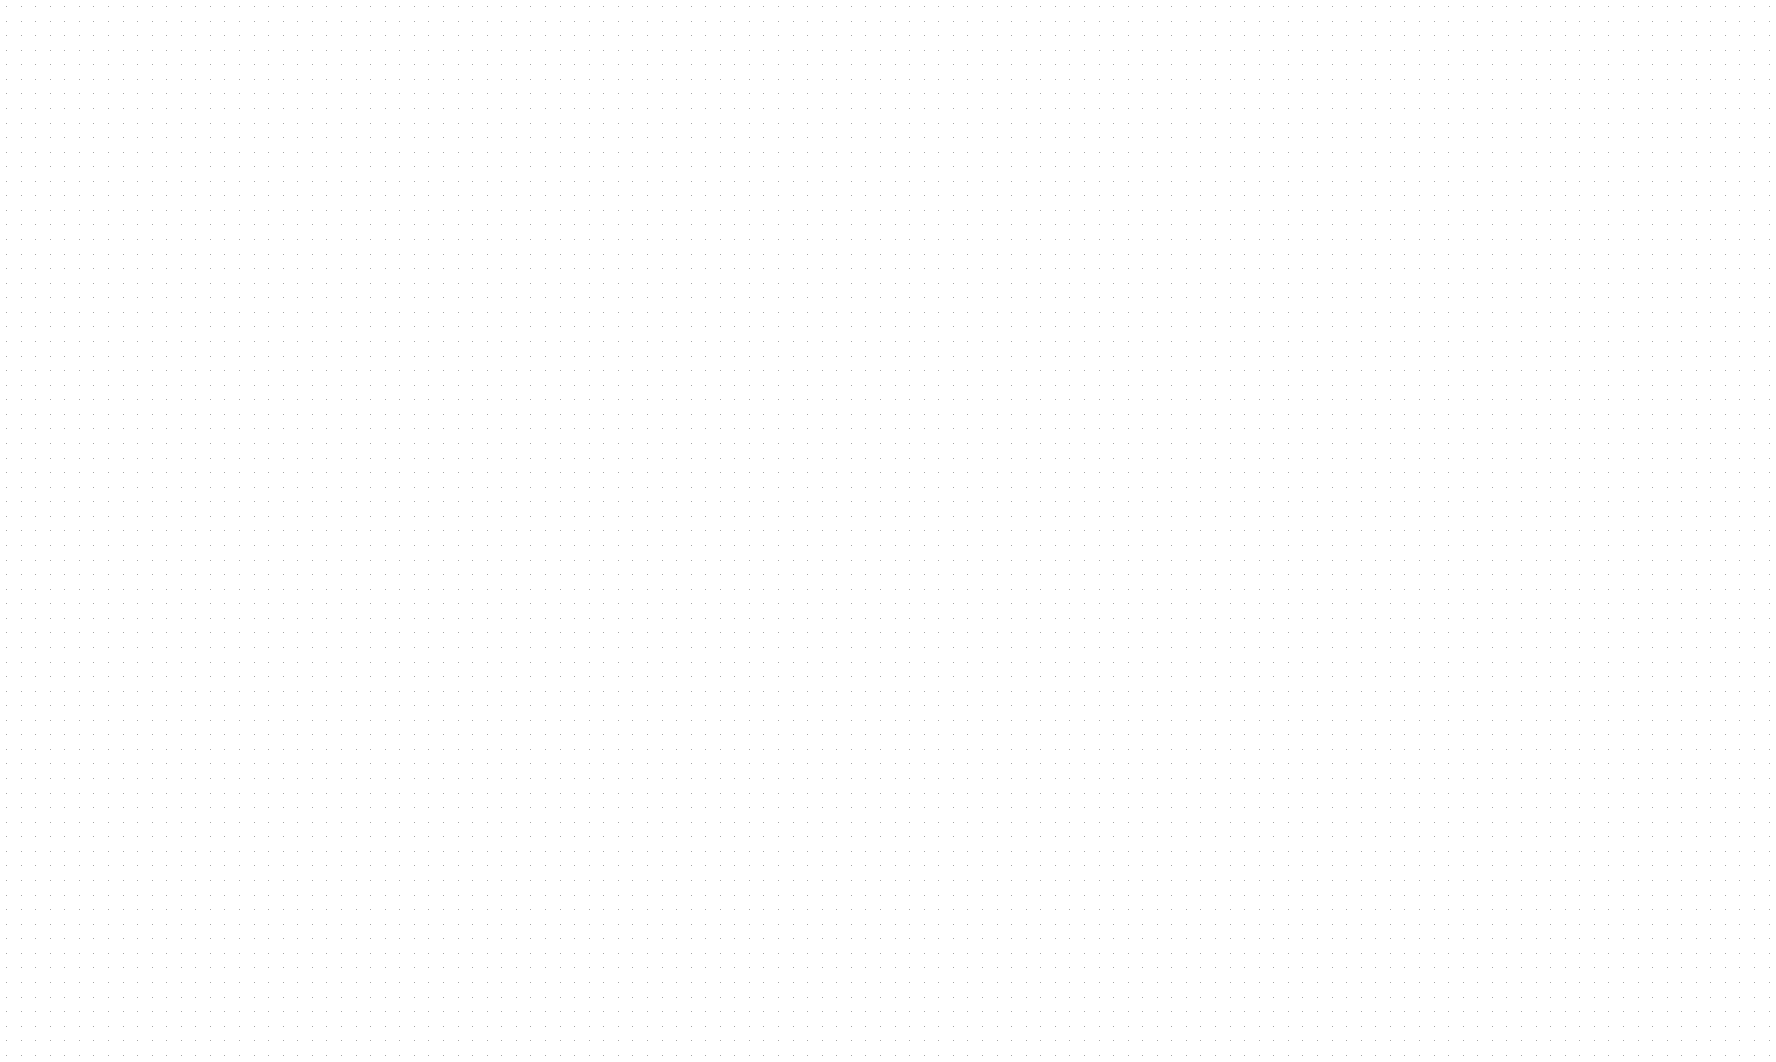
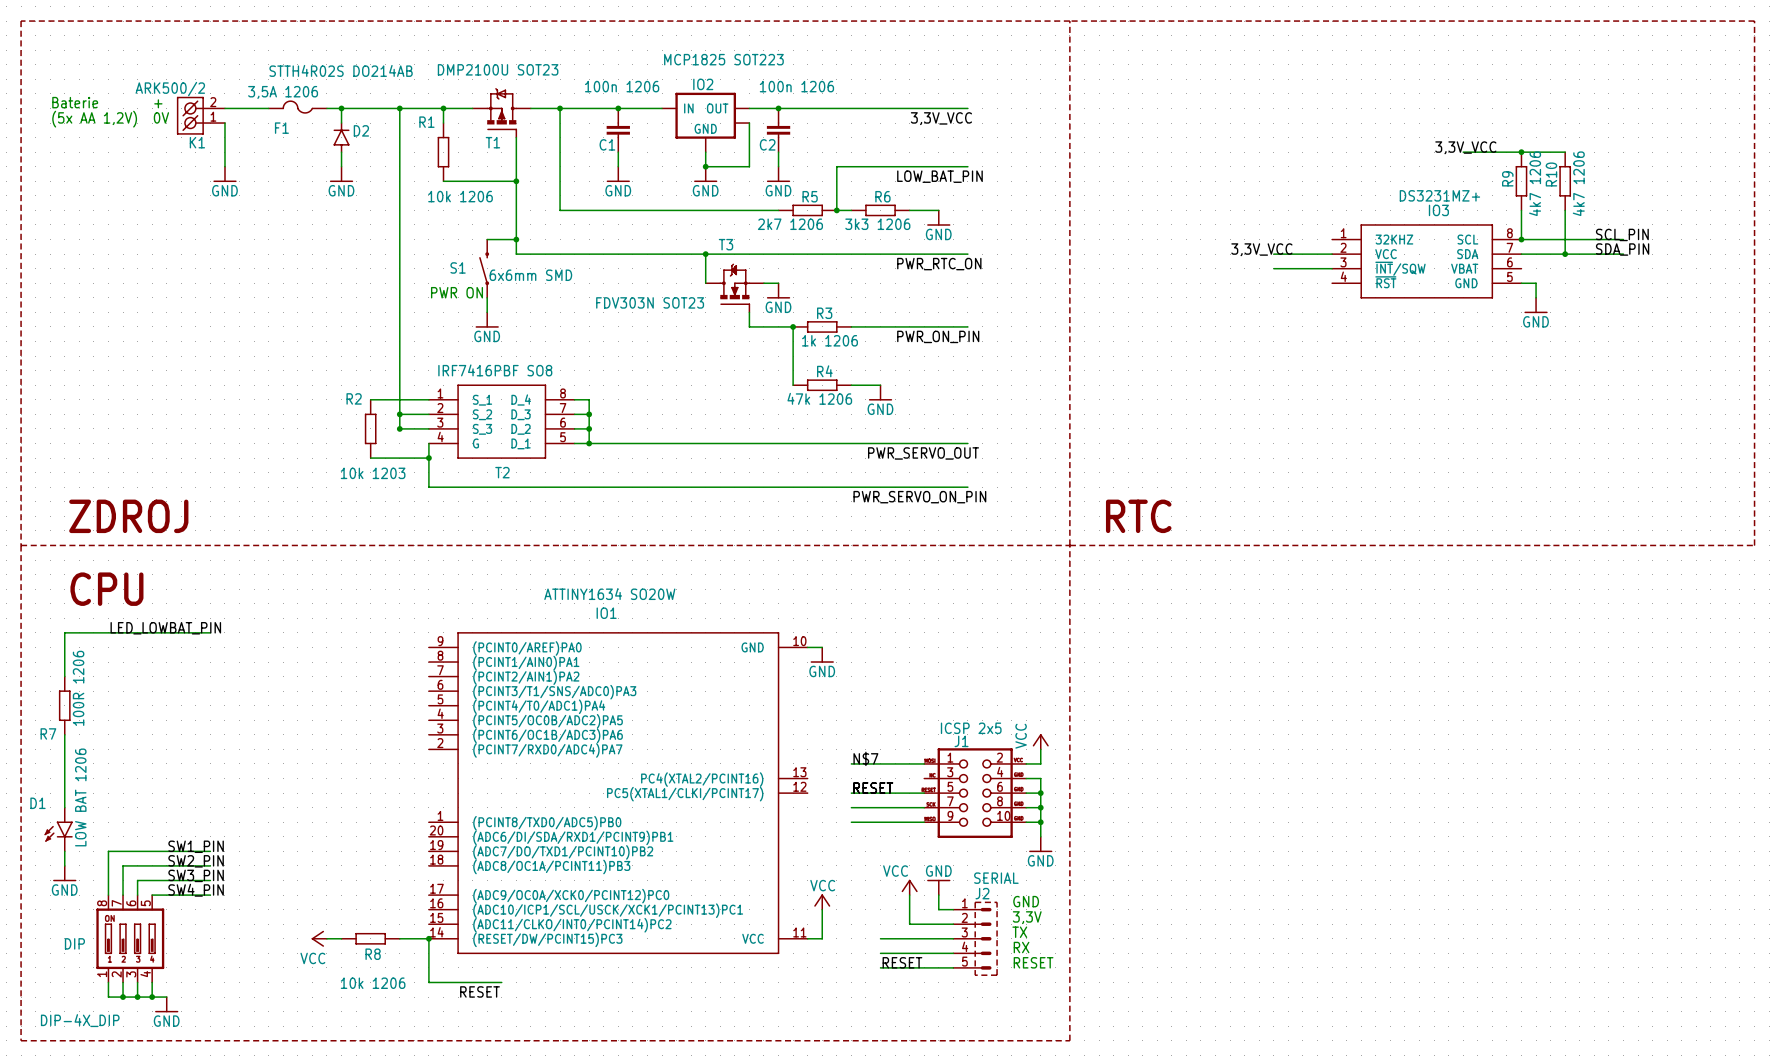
line: none -> (1069, 21) (1069, 1040) (21, 1040) (21, 21) (1754, 21) (1754, 545) (21, 545)
text: none -> Baterie (75, 102)
text: none -> + (158, 103)
F1: none -> 3,5A 1206 (297, 107)
wire: none -> (224, 108) (268, 108)
wire: none -> (326, 108) (472, 108)
wire: none -> (341, 108) (341, 123)
junction: none -> (341, 108)
wire: none -> (399, 108) (399, 428) (428, 428)
junction: none -> (399, 108)
wire: none -> (443, 108) (443, 123)
junction: none -> (443, 108)
wire: none -> (530, 108) (662, 108)
wire: none -> (560, 108) (560, 210) (778, 210)
junction: none -> (560, 108)
junction: none -> (618, 108)
wire: none -> (749, 108) (967, 108)
junction: none -> (778, 108)
T1: none -> DMP2100U SOT23 (501, 113)
K1: none -> ARK500/2 (200, 115)
text: none -> 0V (161, 117)
label: none -> 3,3V_VCC (941, 118)
text: none -> (5x AA 1,2V) (94, 119)
IO2: none -> MCP1825 SOT223 (705, 122)
wire: none -> (224, 123) (224, 166)
wire: none -> (749, 123) (749, 166) (705, 166) (705, 152)
C1: none -> 100n 1206 (618, 130)
C2: none -> 100n 1206 (778, 130)
D2: none -> STTH4R02S DO214AB (341, 137)
wire: none -> (516, 137) (516, 254) (967, 254)
label: none -> 3,3V_VCC (1465, 147)
wire: none -> (341, 152) (341, 166)
R1: none -> 10k 1206 (443, 152)
wire: none -> (618, 152) (618, 166)
wire: none -> (778, 152) (778, 166)
wire: none -> (1463, 152) (1565, 152)
junction: none -> (1521, 152)
junction: none -> (705, 166)
wire: none -> (967, 166) (836, 166) (836, 210) (851, 210)
power symbol: none -> GND (224, 174)
power symbol: none -> GND (341, 174)
power symbol: none -> GND (618, 174)
power symbol: none -> GND (705, 174)
power symbol: none -> GND (778, 174)
label: none -> LOW_BAT_PIN (939, 176)
wire: none -> (443, 181) (516, 181)
junction: none -> (516, 181)
R9: none -> 4k7 1206 (1521, 181)
R10: none -> 4k7 1206 (1565, 181)
R5: none -> 2k7 1206 (807, 210)
junction: none -> (836, 210)
R6: none -> 3k3 1206 (880, 210)
wire: none -> (909, 210) (938, 210)
wire: none -> (1521, 210) (1521, 239) (1623, 239)
wire: none -> (1565, 210) (1565, 254)
power symbol: none -> GND (938, 218)
label: none -> SCL_PIN (1622, 234)
wire: none -> (487, 239) (516, 239)
junction: none -> (516, 239)
junction: none -> (1521, 239)
label: none -> 3,3V_VCC (1261, 249)
label: none -> SDA_PIN (1622, 249)
wire: none -> (705, 254) (705, 283)
junction: none -> (705, 254)
wire: none -> (1273, 254) (1332, 254)
wire: none -> (1521, 254) (1623, 254)
junction: none -> (1565, 254)
IO3: none -> DS3231MZ+ (1426, 261)
label: none -> PWR_RTC_ON (939, 264)
S1: none -> 6x6mm SMD (484, 268)
wire: none -> (1273, 268) (1332, 268)
wire: none -> (763, 283) (778, 283)
wire: none -> (1521, 283) (1536, 283) (1536, 297)
T3: none -> FDV303N SOT23 (734, 288)
power symbol: none -> GND (778, 290)
text: none -> PWR ON (457, 292)
wire: none -> (487, 297) (487, 312)
power symbol: none -> GND (1536, 305)
wire: none -> (749, 312) (749, 326) (793, 326) (793, 385)
power symbol: none -> GND (487, 320)
junction: none -> (793, 326)
R3: none -> 1k 1206 (822, 326)
wire: none -> (851, 326) (967, 326)
label: none -> PWR_ON_PIN (938, 336)
R4: none -> 47k 1206 (822, 385)
wire: none -> (851, 385) (880, 385)
power symbol: none -> GND (880, 392)
wire: none -> (370, 399) (428, 399)
wire: none -> (574, 399) (589, 399) (589, 443)
wire: none -> (399, 414) (428, 414)
junction: none -> (399, 414)
wire: none -> (574, 414) (589, 414)
junction: none -> (589, 414)
T2: none -> IRF7416PBF SO8 (501, 421)
R2: none -> 10k 1203 (370, 428)
junction: none -> (399, 428)
wire: none -> (574, 428) (589, 428)
junction: none -> (589, 428)
wire: none -> (428, 443) (428, 487) (967, 487)
wire: none -> (574, 443) (967, 443)
junction: none -> (589, 443)
label: none -> PWR_SERVO_OUT (923, 453)
wire: none -> (370, 458) (428, 458)
junction: none -> (428, 458)
label: none -> PWR_SERVO_ON_PIN (919, 497)
text: none -> ZDROJ (128, 516)
text: none -> RTC (1138, 516)
text: none -> CPU (106, 589)
label: none -> LED_LOWBAT_PIN (165, 628)
wire: none -> (210, 632) (64, 632) (64, 676)
wire: none -> (807, 647) (822, 647)
power symbol: none -> GND (822, 655)
R7: none -> 100R 1206 (64, 705)
wire: none -> (64, 734) (64, 807)
power symbol: none -> VCC (1040, 741)
wire: none -> (1040, 749) (1040, 763) (1026, 763)
label: none -> N$7 (865, 758)
wire: none -> (851, 763) (924, 763)
wire: none -> (1026, 778) (1040, 778) (1040, 836)
label: none -> RESET (873, 788)
IO1: none -> ATTINY1634 SO20W (618, 793)
wire: none -> (851, 793) (924, 793)
J1: none -> ICSP 2x5 (975, 793)
wire: none -> (1026, 793) (1040, 793)
junction: none -> (1040, 793)
wire: none -> (851, 807) (924, 807)
wire: none -> (1026, 807) (1040, 807)
junction: none -> (1040, 807)
wire: none -> (851, 822) (924, 822)
wire: none -> (1026, 822) (1040, 822)
junction: none -> (1040, 822)
D1: none -> LOW BAT 1206 (58, 829)
power symbol: none -> GND (1040, 844)
label: none -> SW1_PIN (196, 846)
wire: none -> (64, 851) (64, 865)
wire: none -> (210, 851) (108, 851) (108, 895)
label: none -> SW2_PIN (196, 861)
wire: none -> (210, 865) (123, 865) (123, 895)
power symbol: none -> GND (64, 873)
label: none -> SW3_PIN (196, 875)
wire: none -> (210, 880) (137, 880) (137, 895)
power symbol: none -> VCC (909, 887)
power symbol: none -> GND (938, 887)
label: none -> SW4_PIN (196, 890)
wire: none -> (152, 895) (210, 895)
wire: none -> (909, 895) (909, 924) (953, 924)
wire: none -> (938, 895) (938, 909) (953, 909)
text: none -> GND (1026, 901)
power symbol: none -> VCC (822, 902)
wire: none -> (822, 909) (822, 938) (807, 938)
text: none -> 3,3V (1027, 917)
text: none -> TX (1019, 932)
DIP: none -> DIP-4X_DIP (130, 938)
power symbol: none -> VCC (319, 938)
wire: none -> (326, 938) (341, 938)
R8: none -> 10k 1206 (370, 938)
wire: none -> (399, 938) (428, 938) (428, 982) (501, 982)
junction: none -> (428, 938)
wire: none -> (880, 938) (953, 938)
J2: none -> SERIAL (975, 938)
text: none -> RX (1021, 947)
wire: none -> (880, 953) (953, 953)
label: none -> RESET (902, 962)
text: none -> RESET (1033, 962)
wire: none -> (880, 967) (953, 967)
wire: none -> (108, 982) (108, 997) (166, 997)
wire: none -> (123, 982) (123, 997)
wire: none -> (137, 982) (137, 997)
wire: none -> (152, 982) (152, 997)
label: none -> RESET (480, 991)
junction: none -> (123, 997)
junction: none -> (137, 997)
junction: none -> (152, 997)
power symbol: none -> GND (166, 1004)

